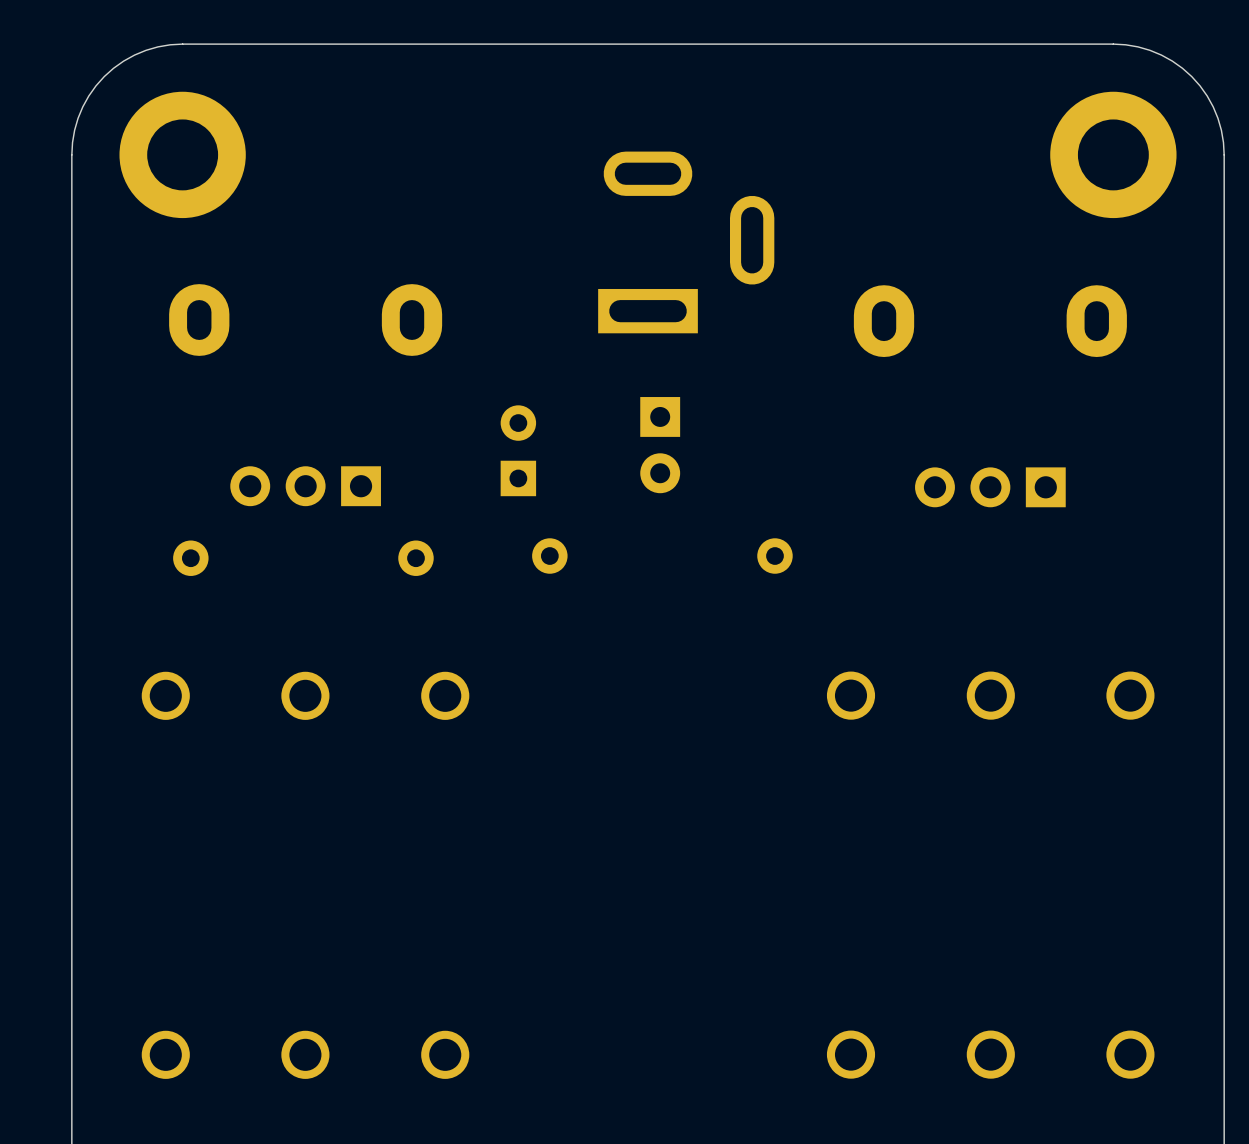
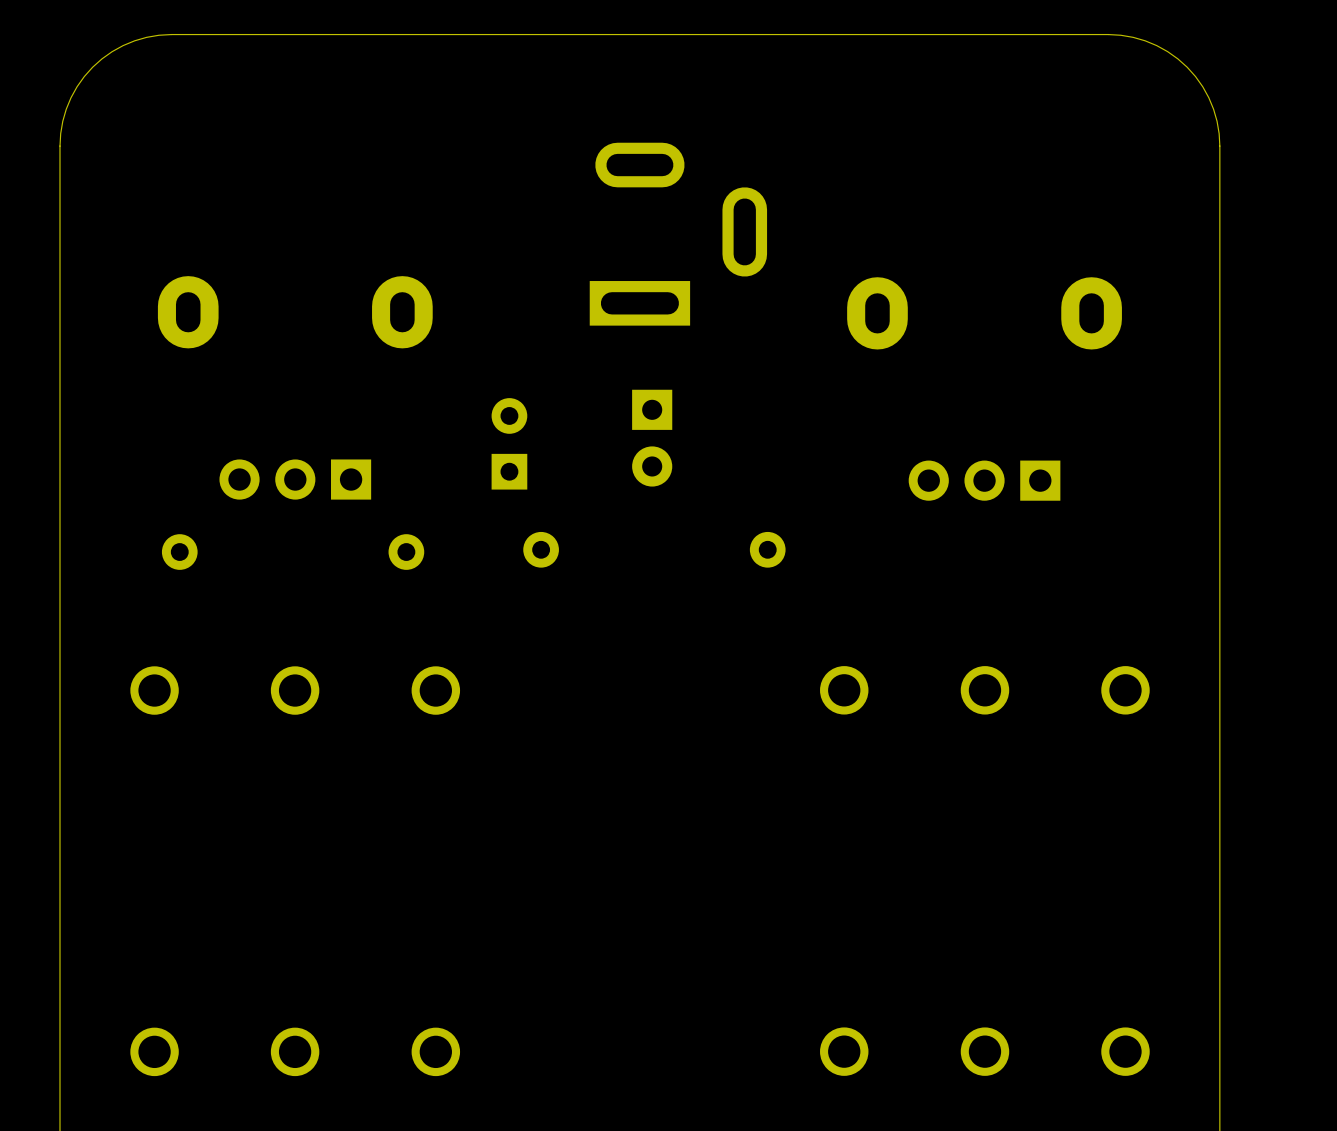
part: (182, 154) -> none
part: (1113, 154) -> none

